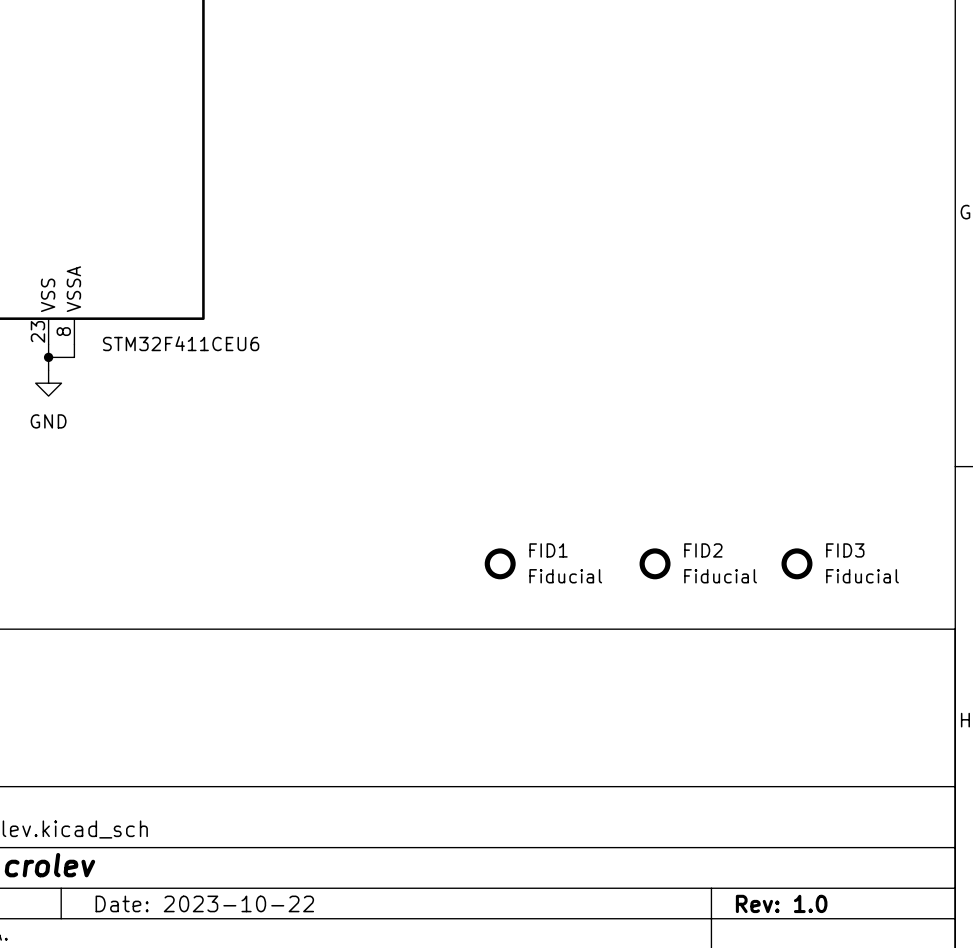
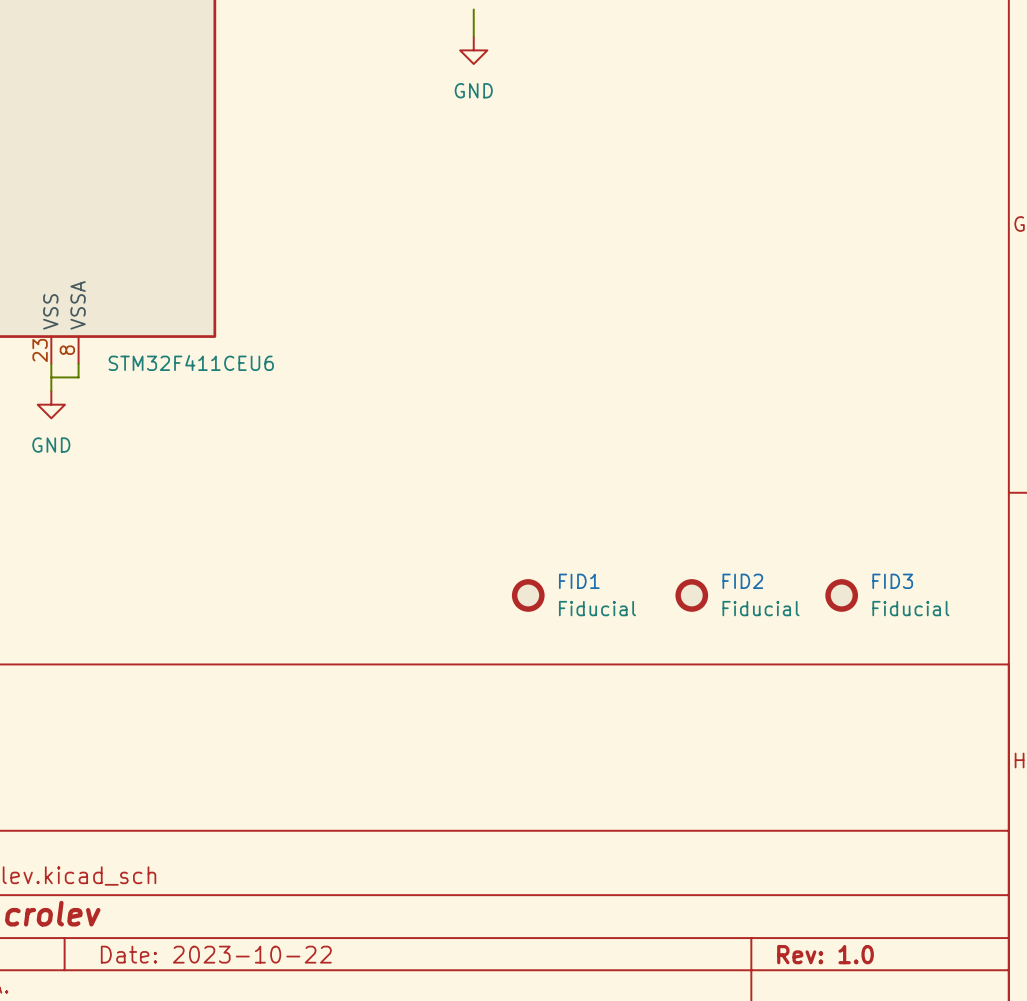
wire: none -> (473, 9) (473, 36)
power symbol: none -> GND (473, 50)
junction: (48, 357) -> none

